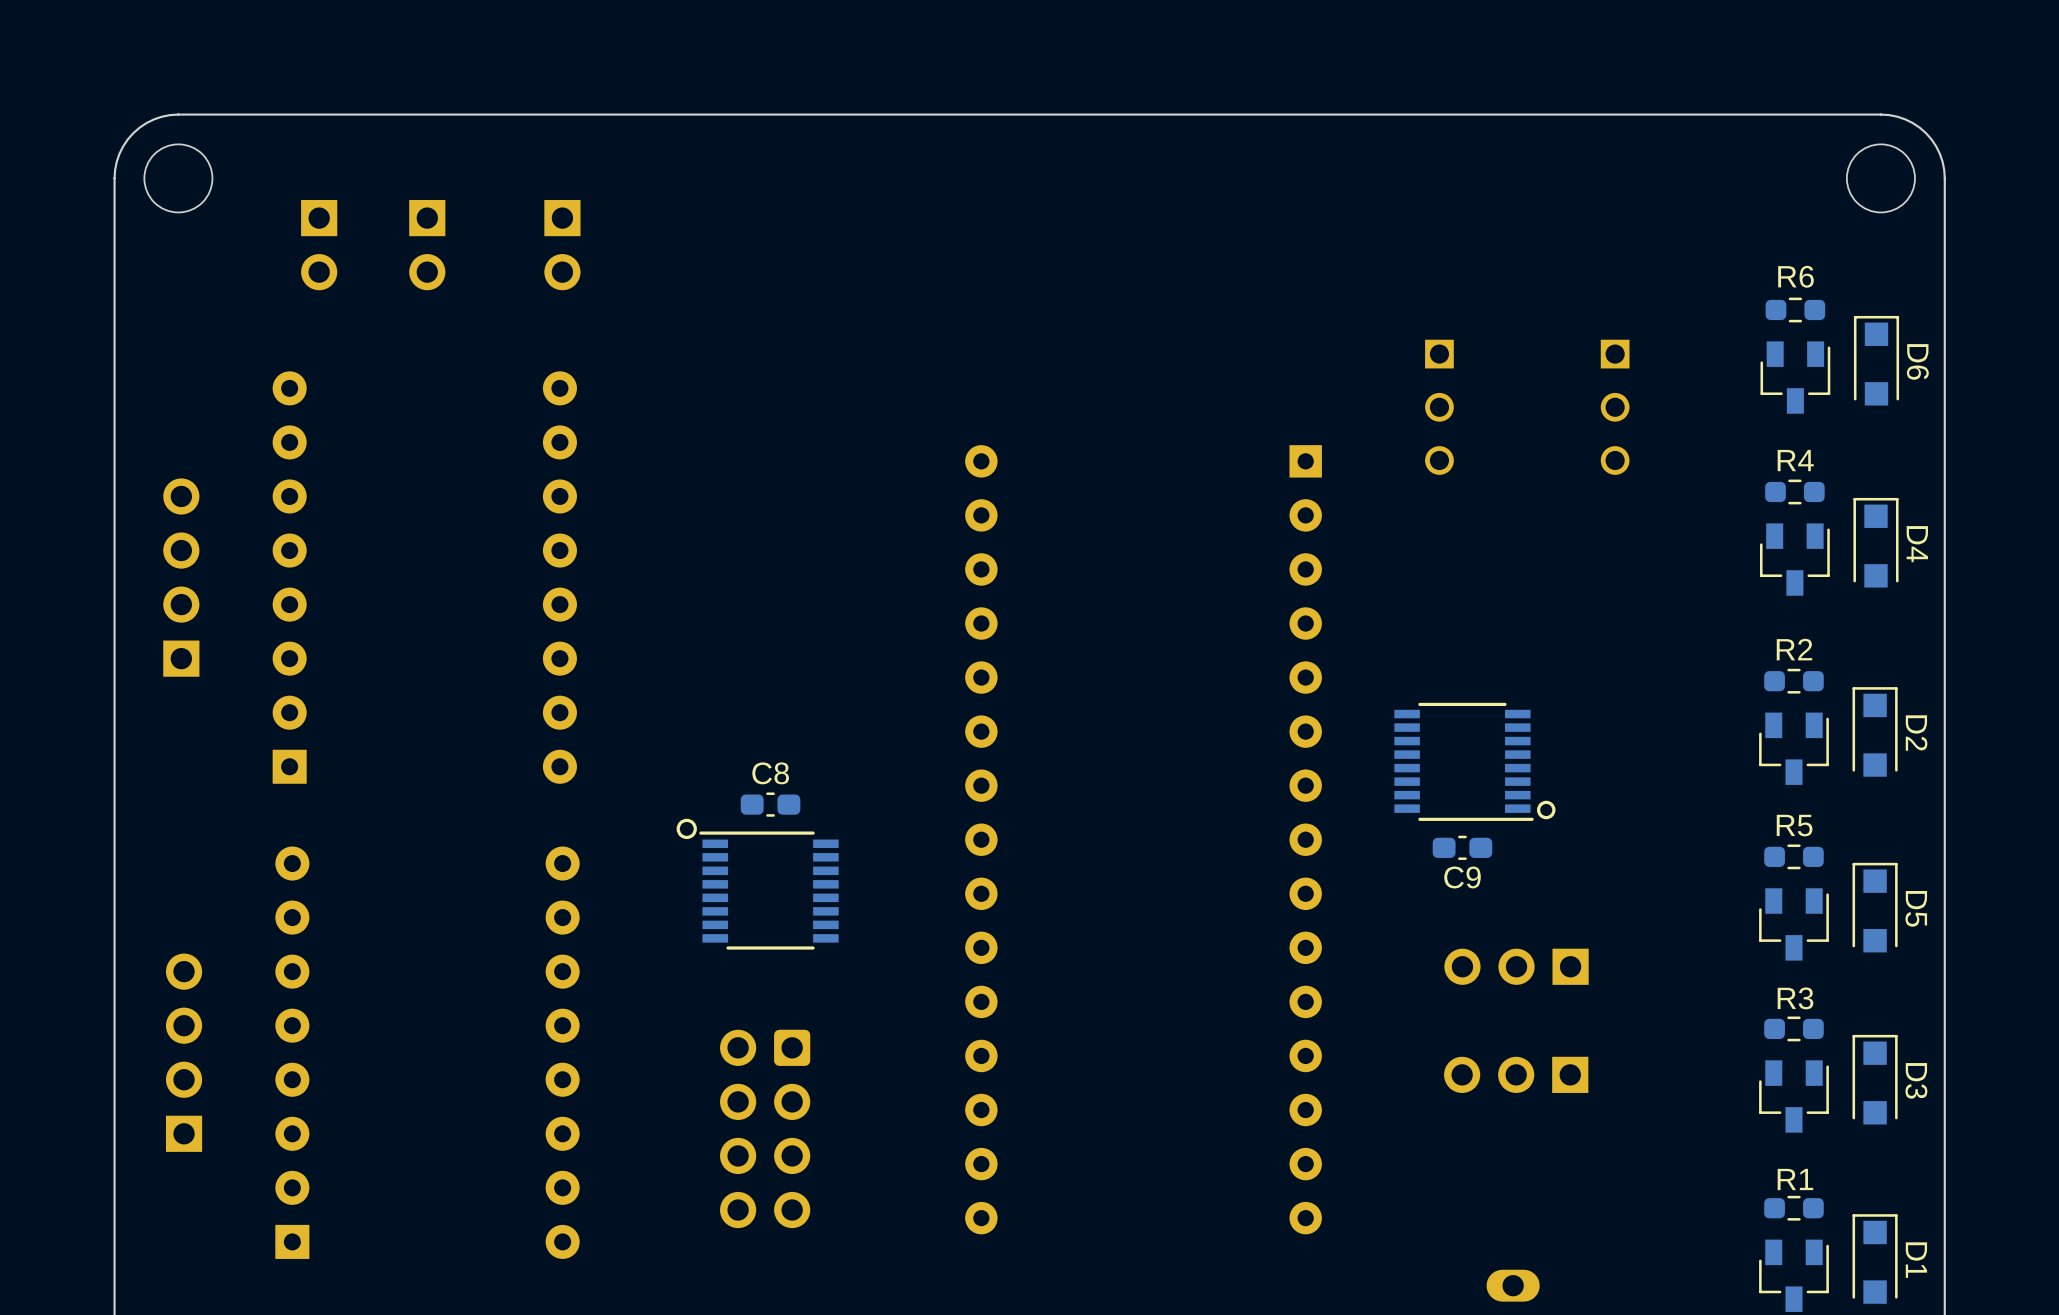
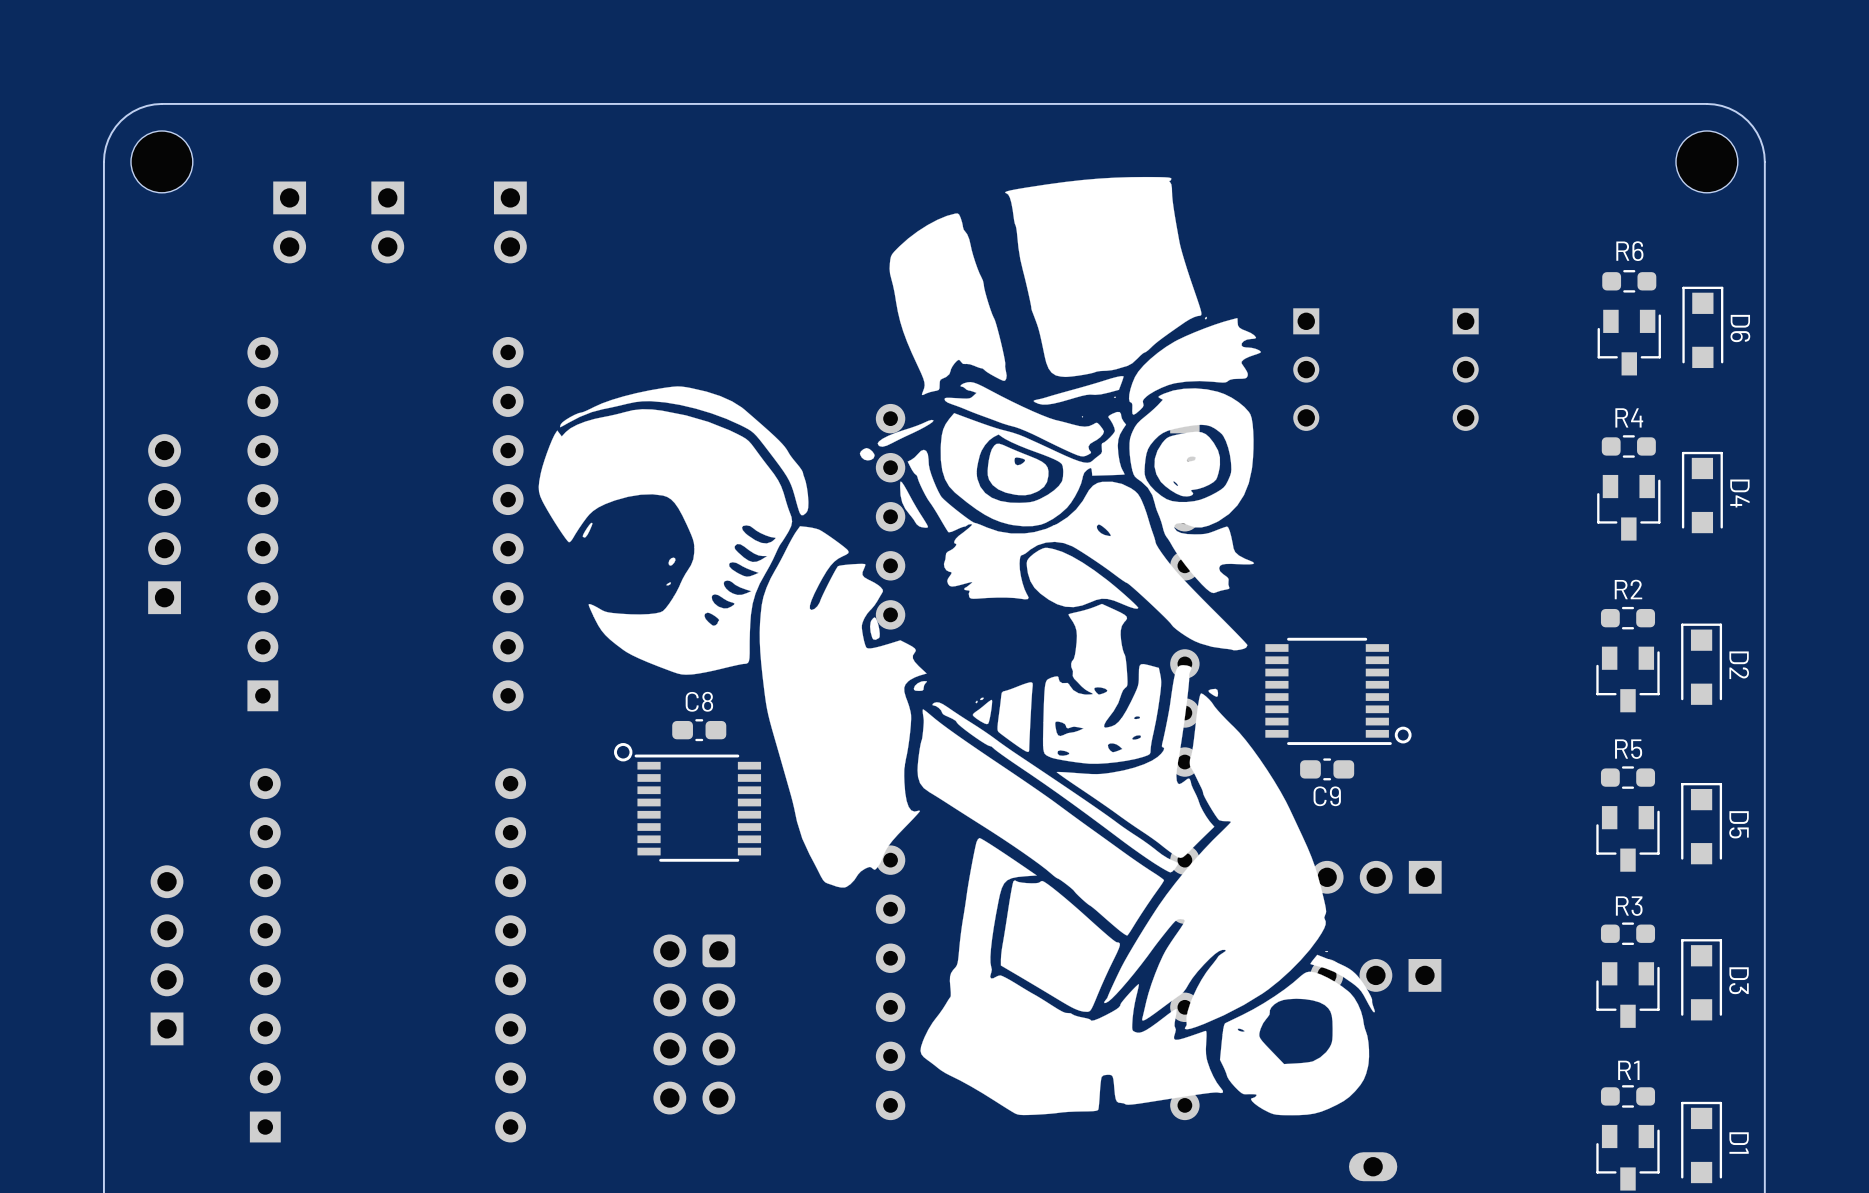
drawing: none -> [538, 176, 1375, 1116]

